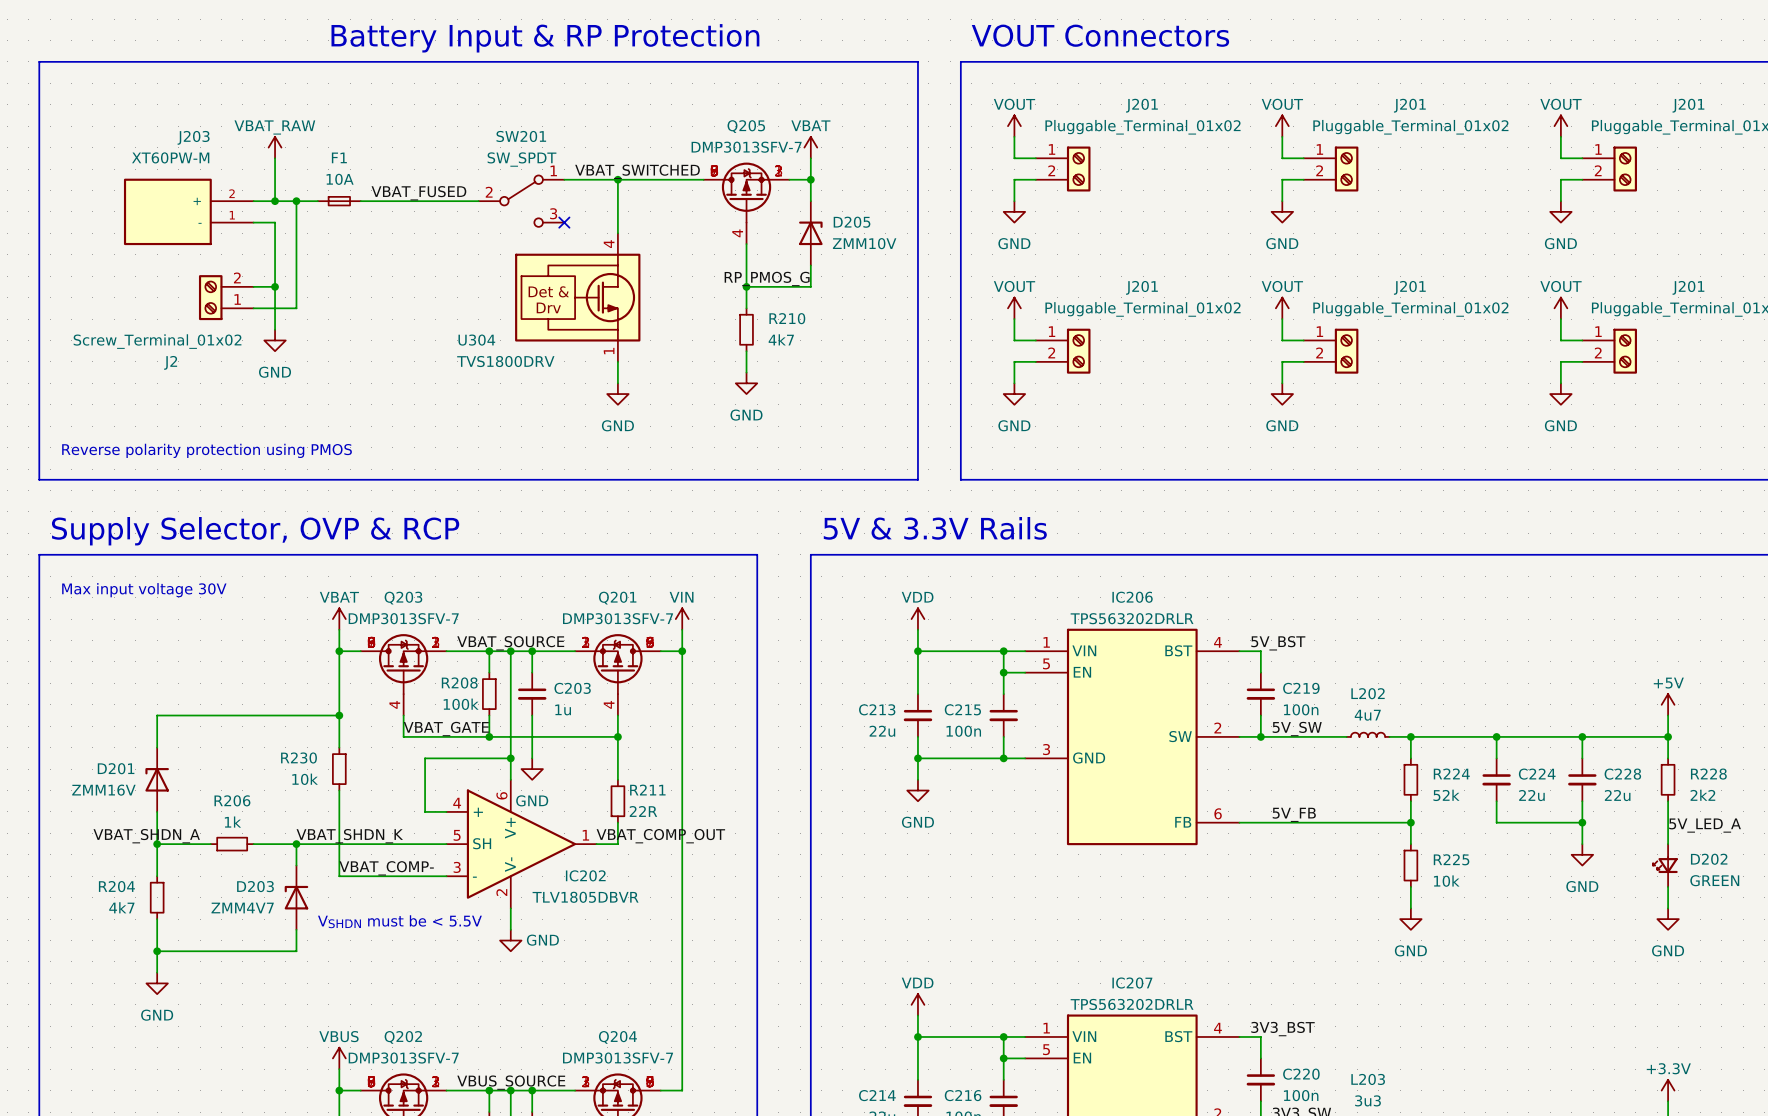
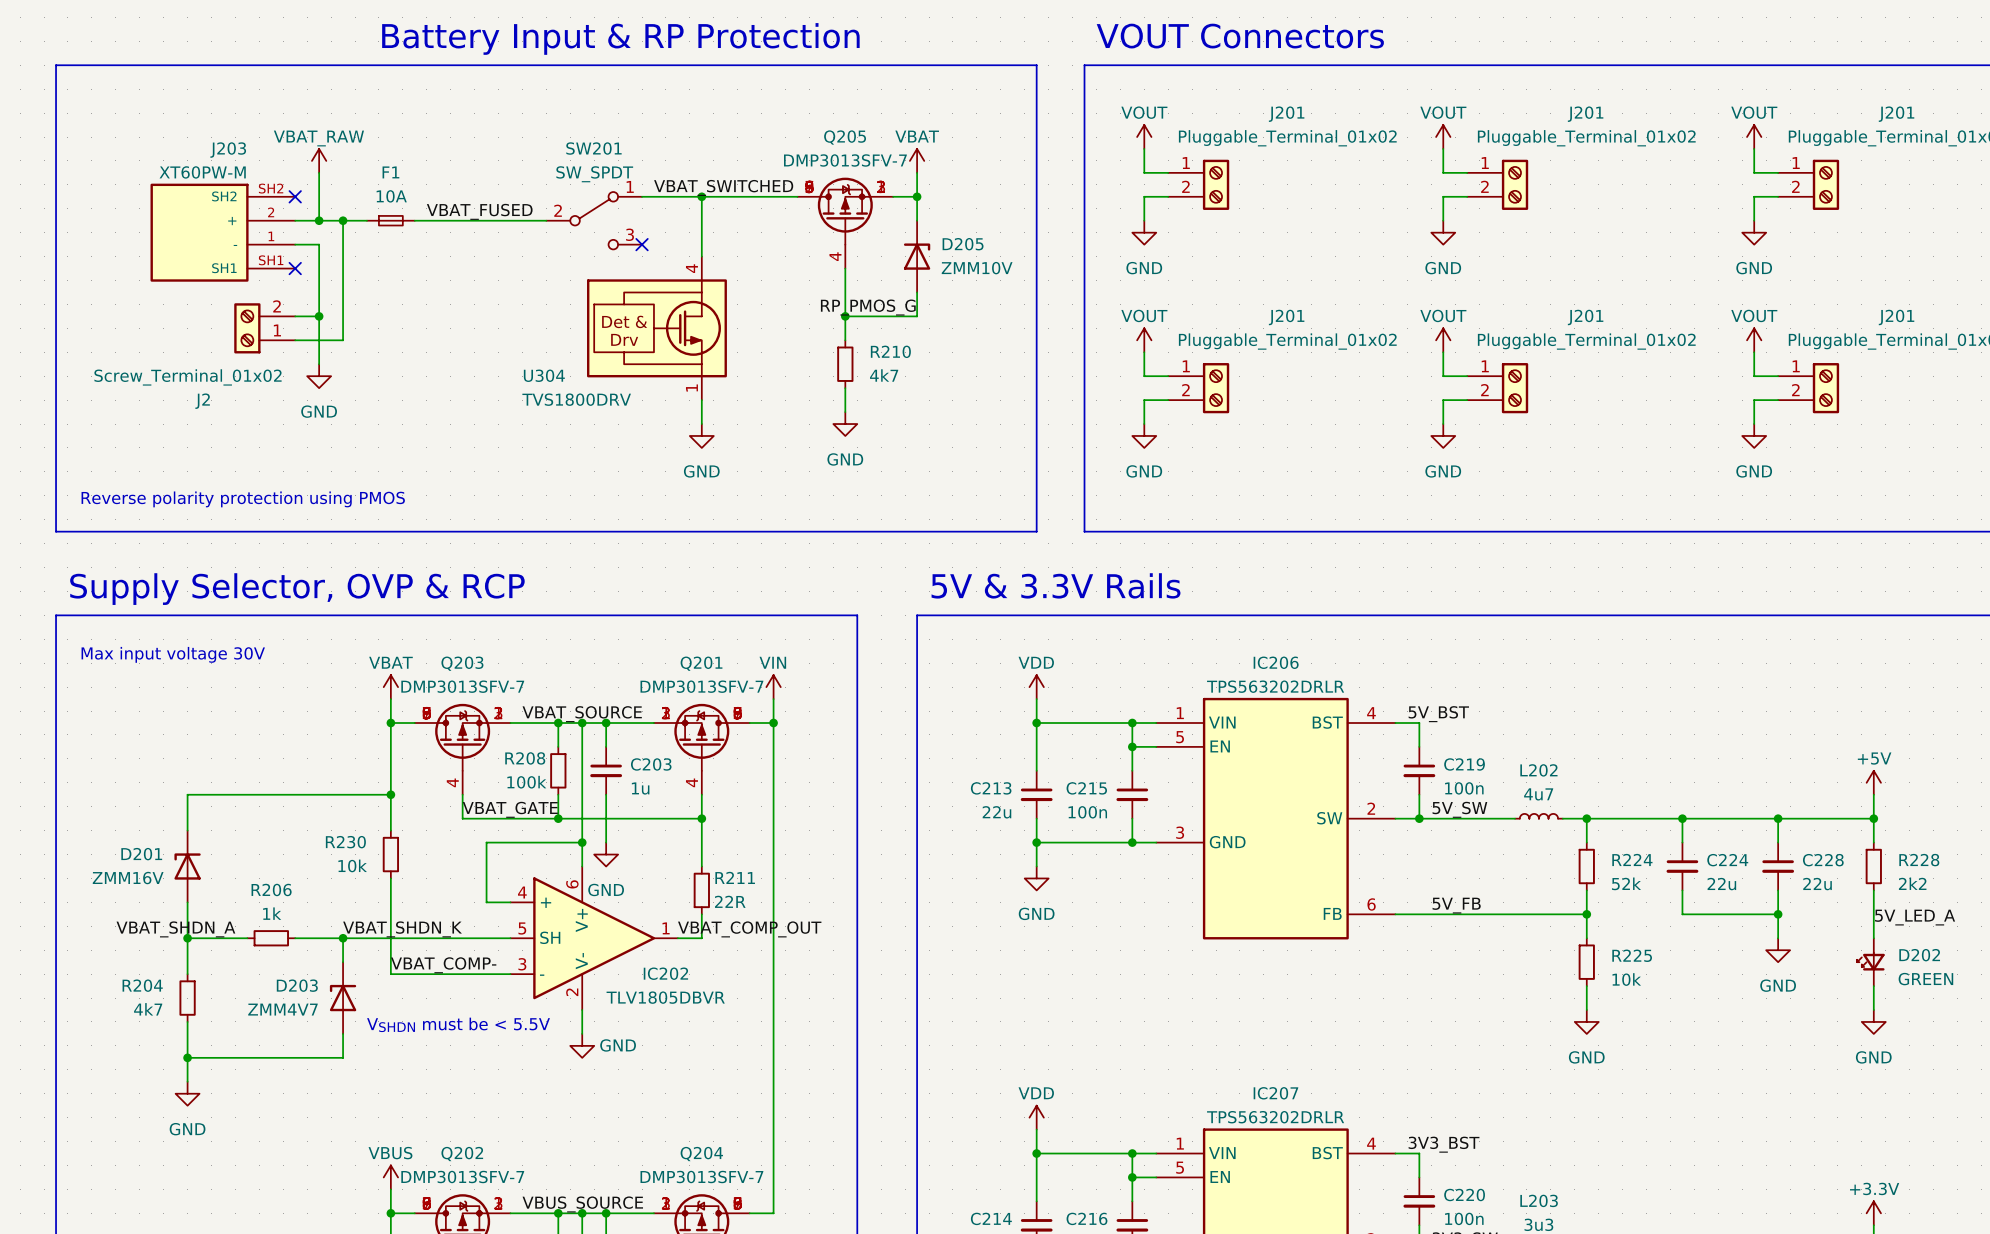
J203 symbol: [123, 178, 254, 246] -> [150, 183, 296, 282]
no-connect mark: none -> (295, 196)
no-connect mark: none -> (295, 268)

